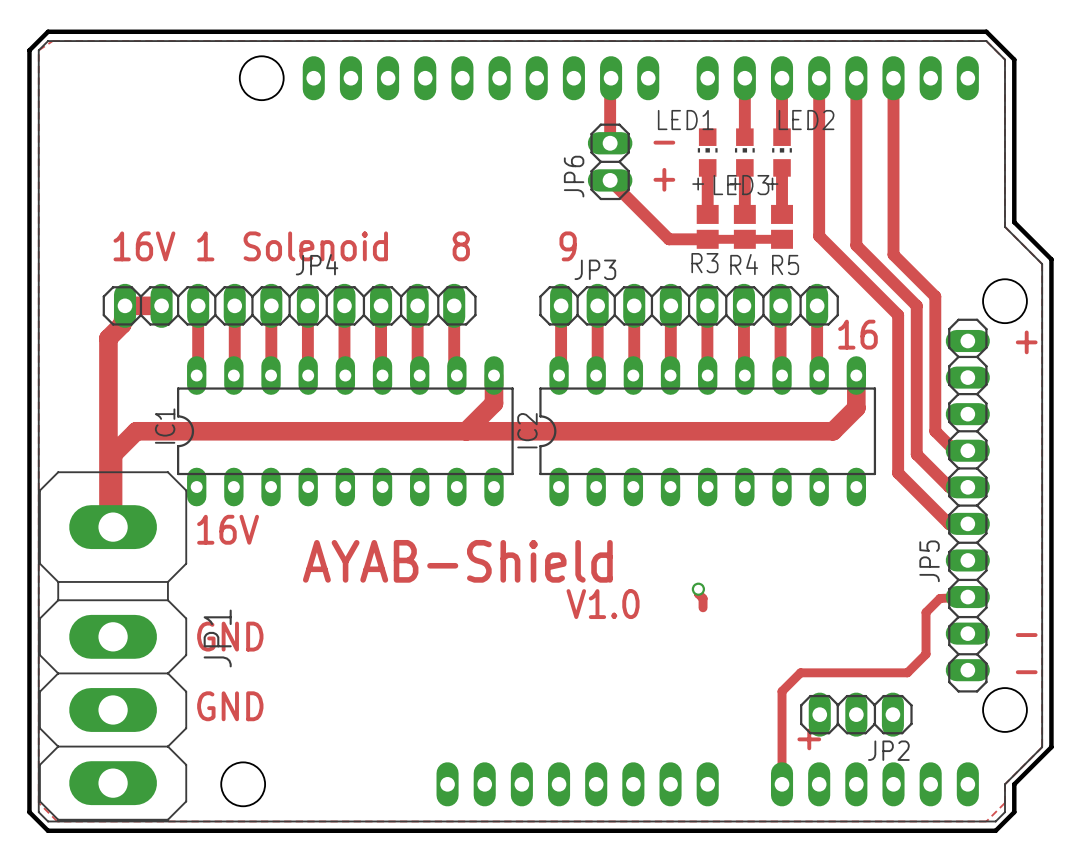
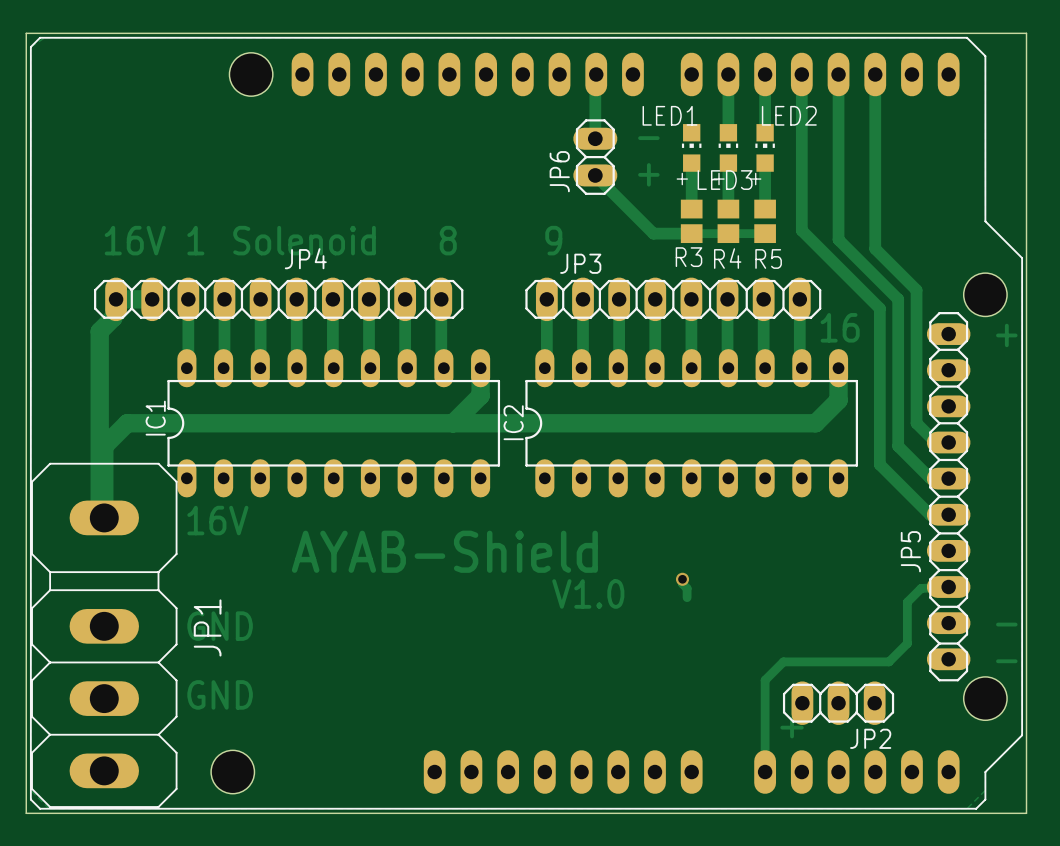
board edge: (48, 31) (986, 31) (1014, 59) (1014, 222) (1051, 259) (1051, 747) (1014, 784) (1014, 812) (995, 830) (48, 830) (29, 812) (29, 50) (48, 31) -> (26, 33) (26, 813) (1026, 813) (1026, 33) (26, 33)
JP1 footprint: [39, 471, 188, 821] -> [31, 462, 178, 808]

